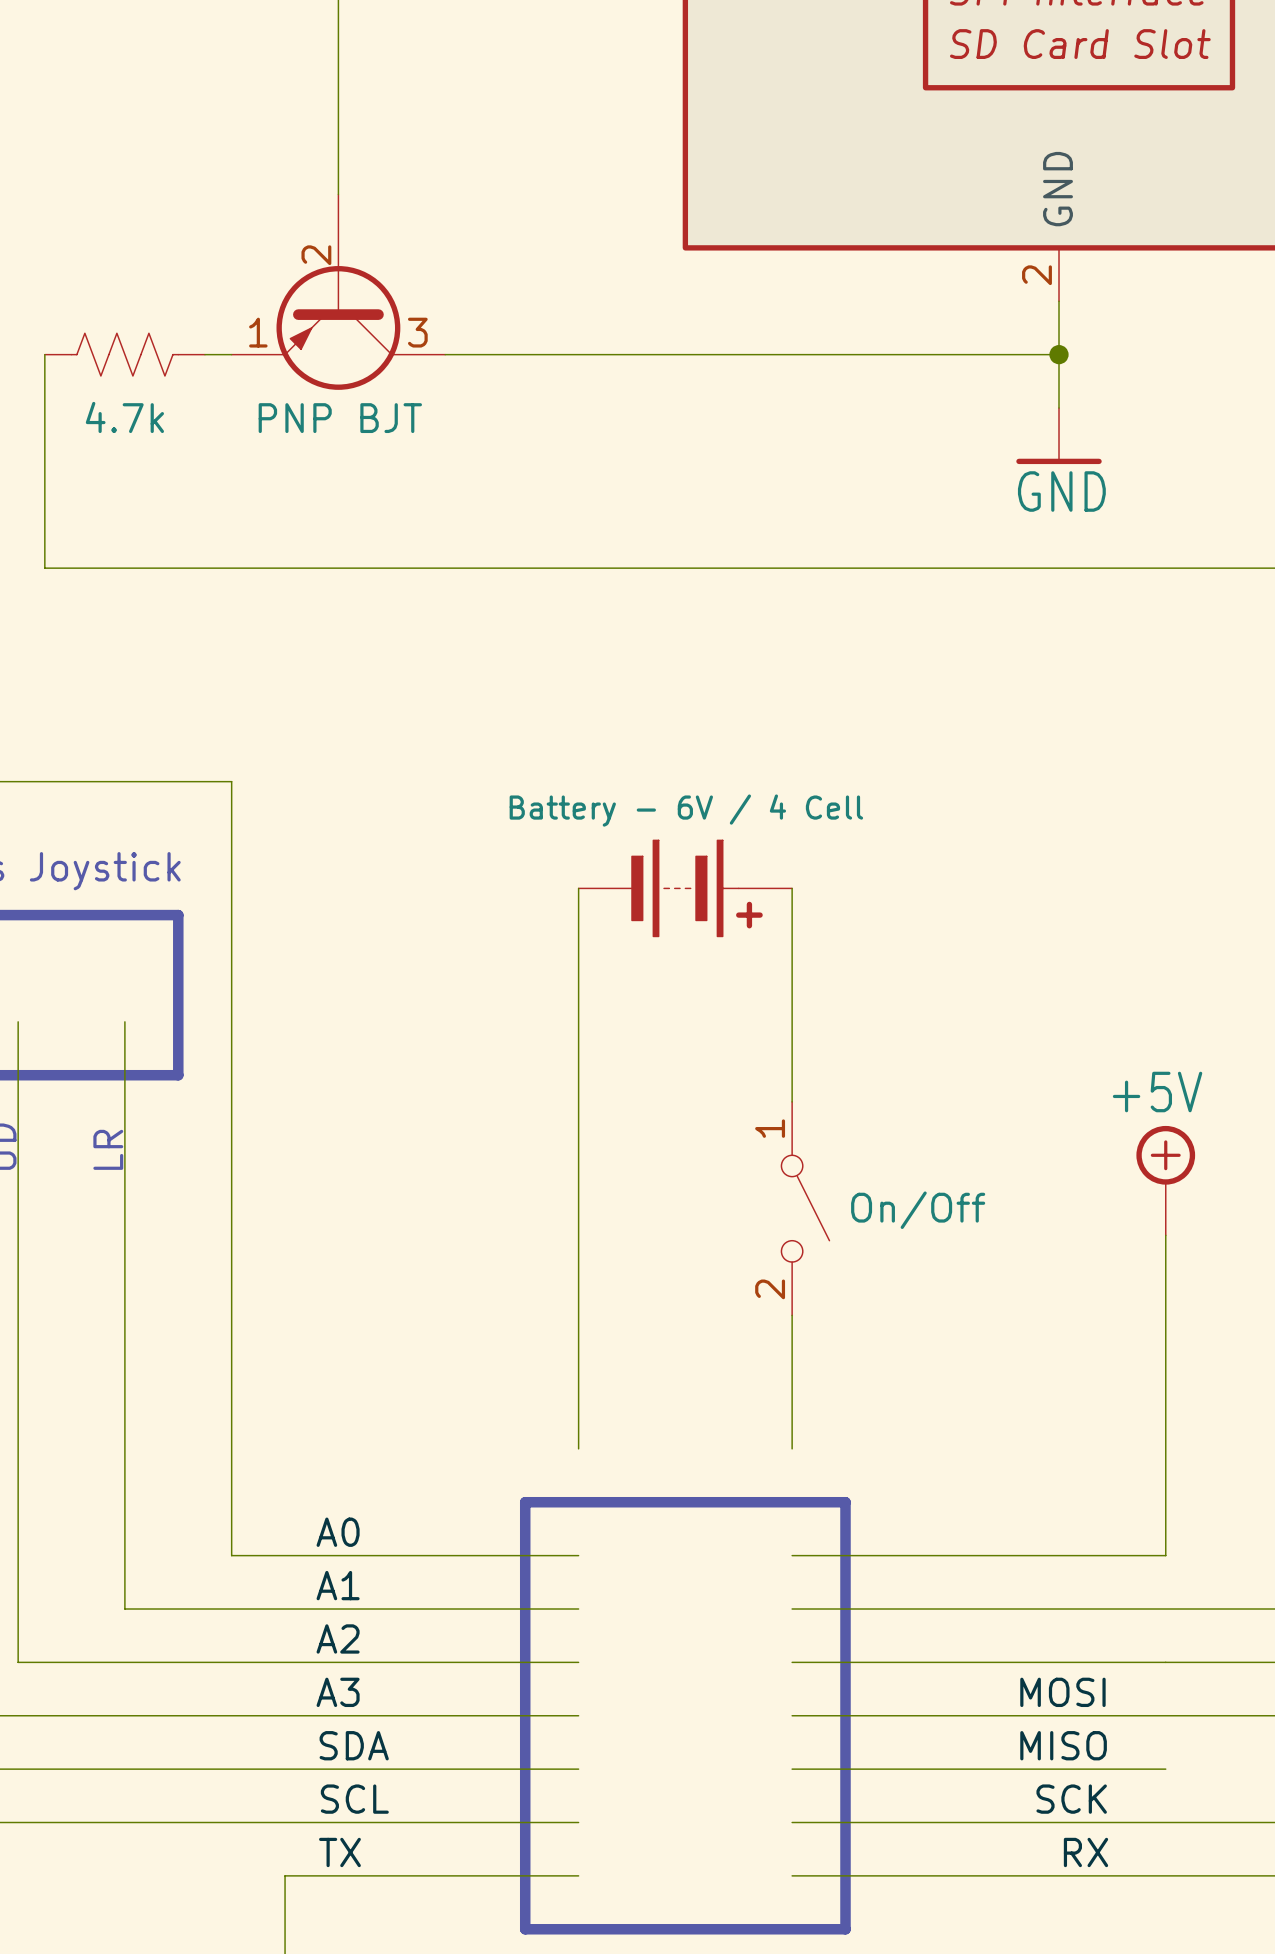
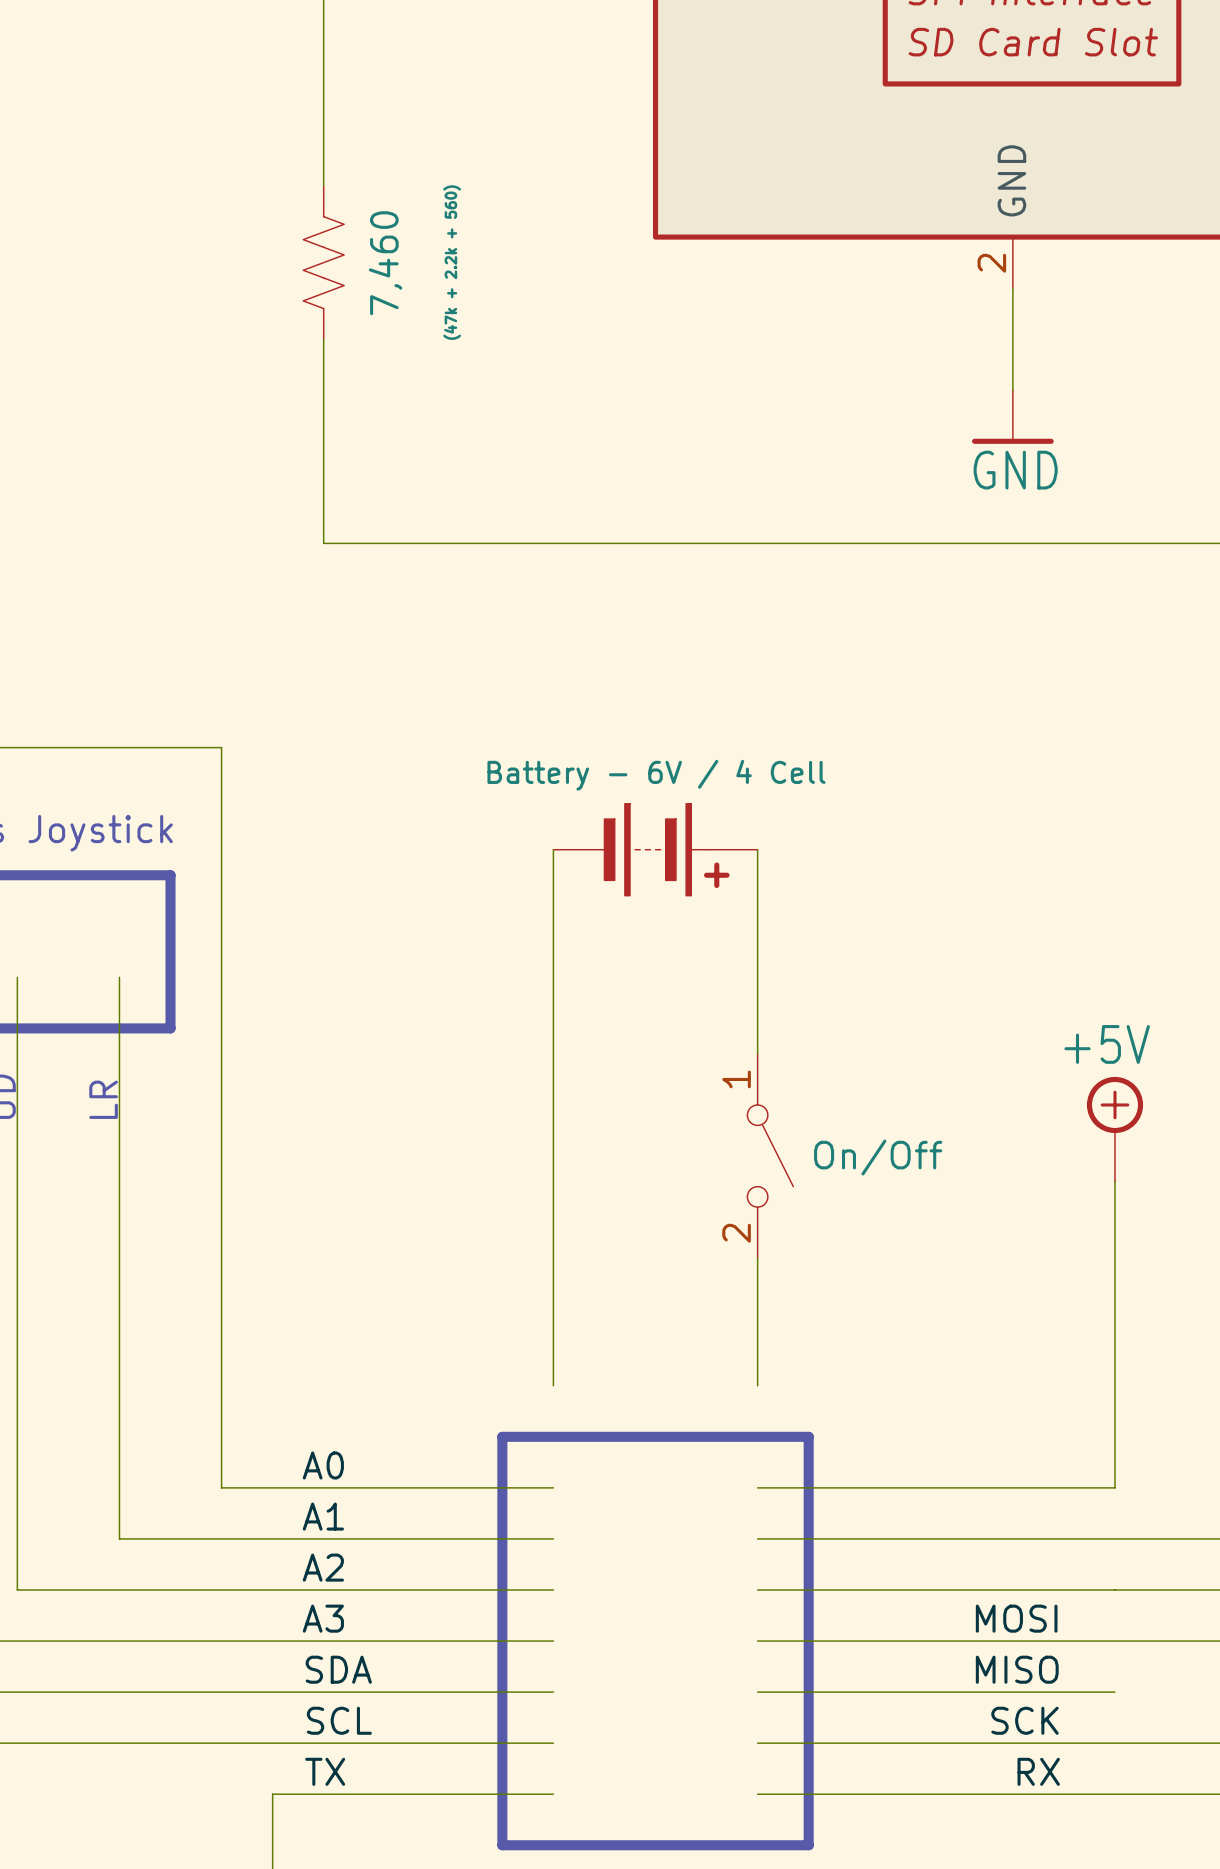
part symbol: [231, 194, 446, 390] -> [303, 186, 345, 340]
part text: none -> (47k + 2.2k + 560) (452, 262)
wire: (44, 354) (44, 568) (338, 568) -> (323, 339) (323, 543)
part: 4.7k (124, 354) -> none
wire: (204, 354) (231, 354) -> none
wire: (445, 354) (1059, 354) -> none
junction: (1059, 354) -> none
part value: PNP BJT (340, 418) -> 7,460 (385, 263)

